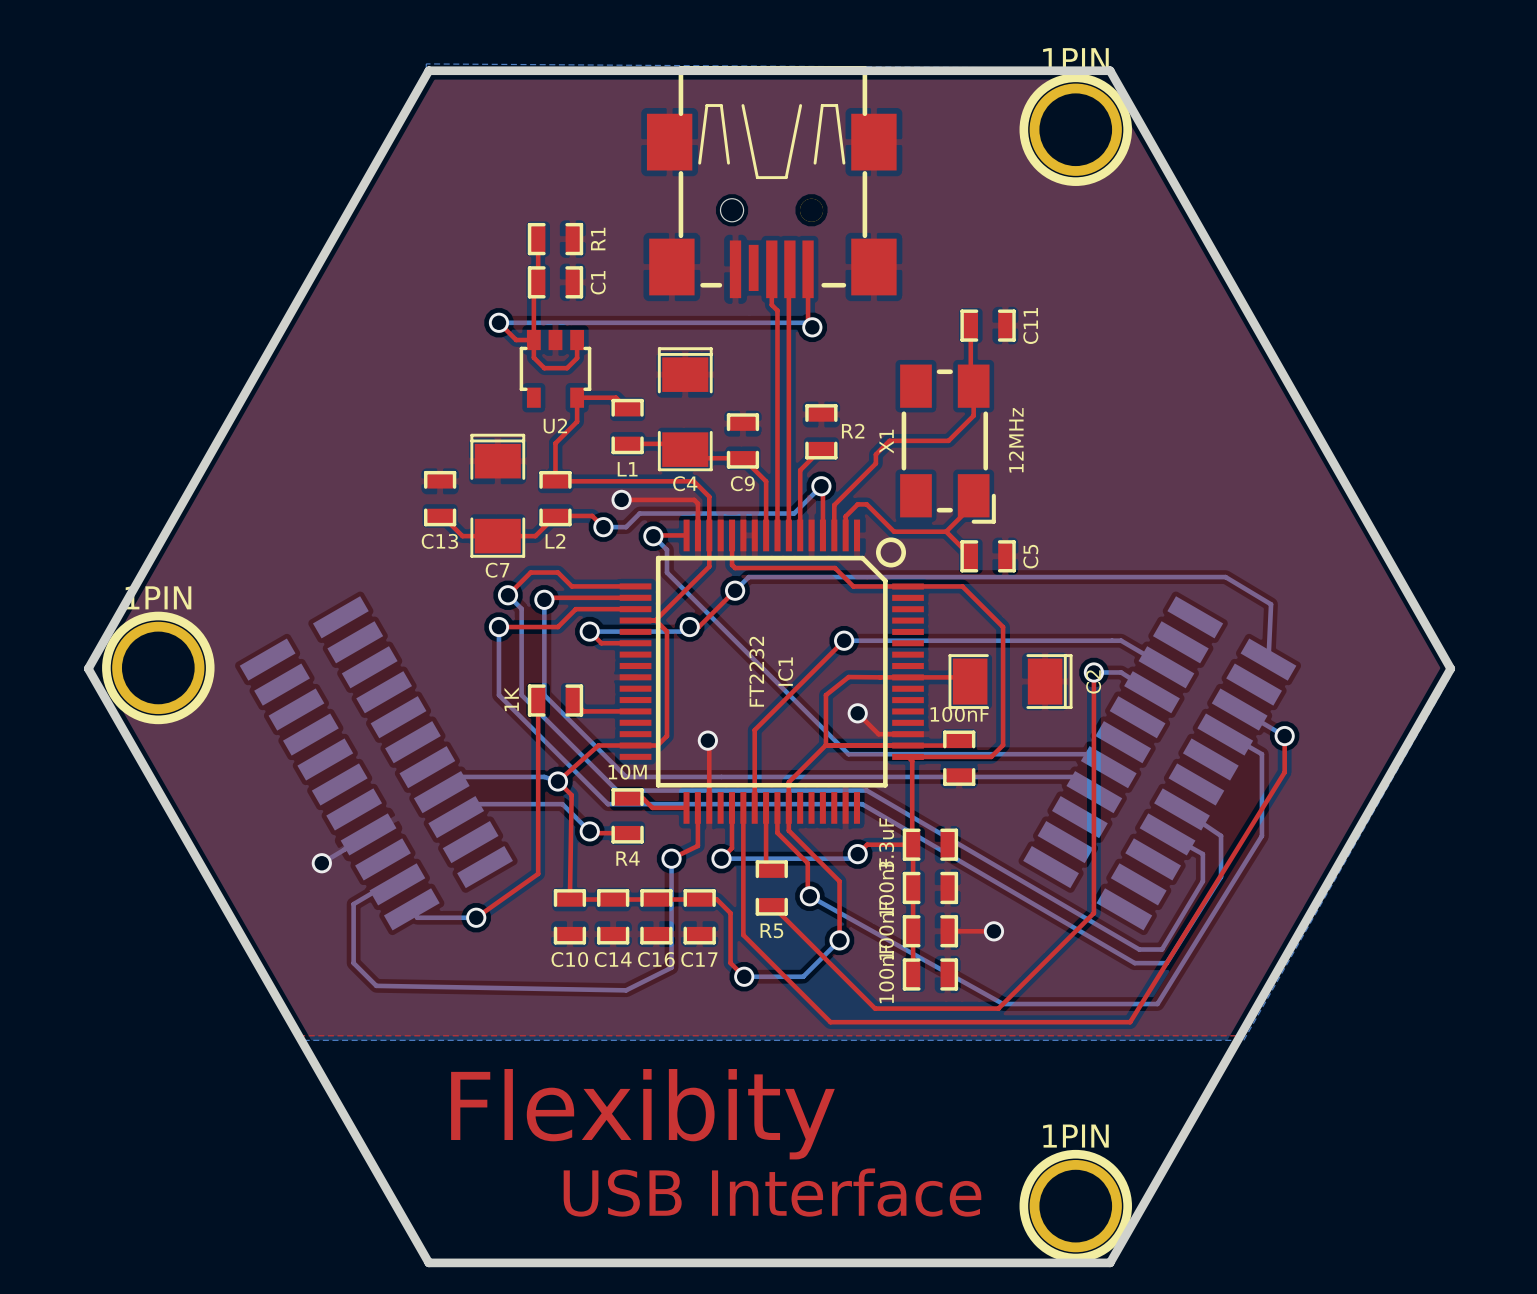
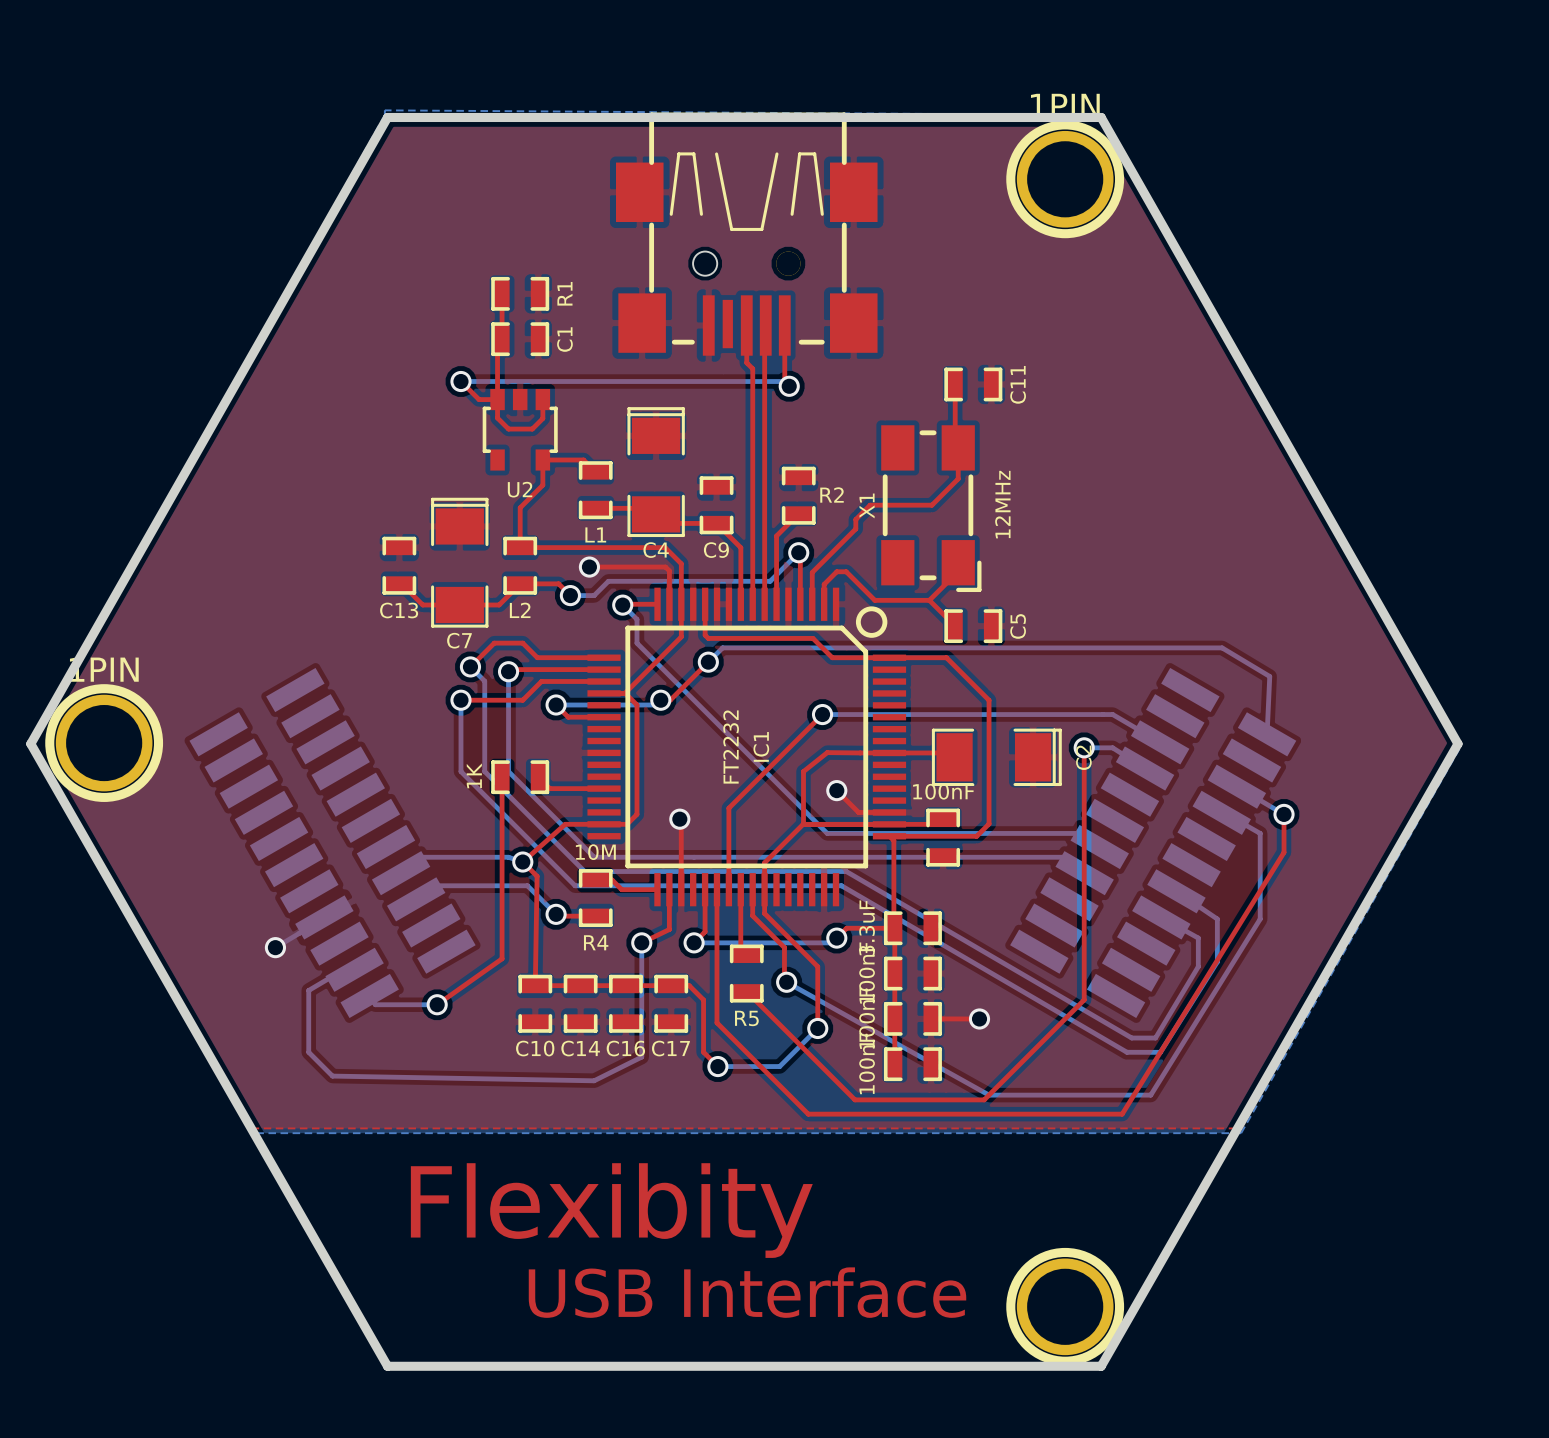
1PIN name: 1PIN (1075, 1136) -> none

